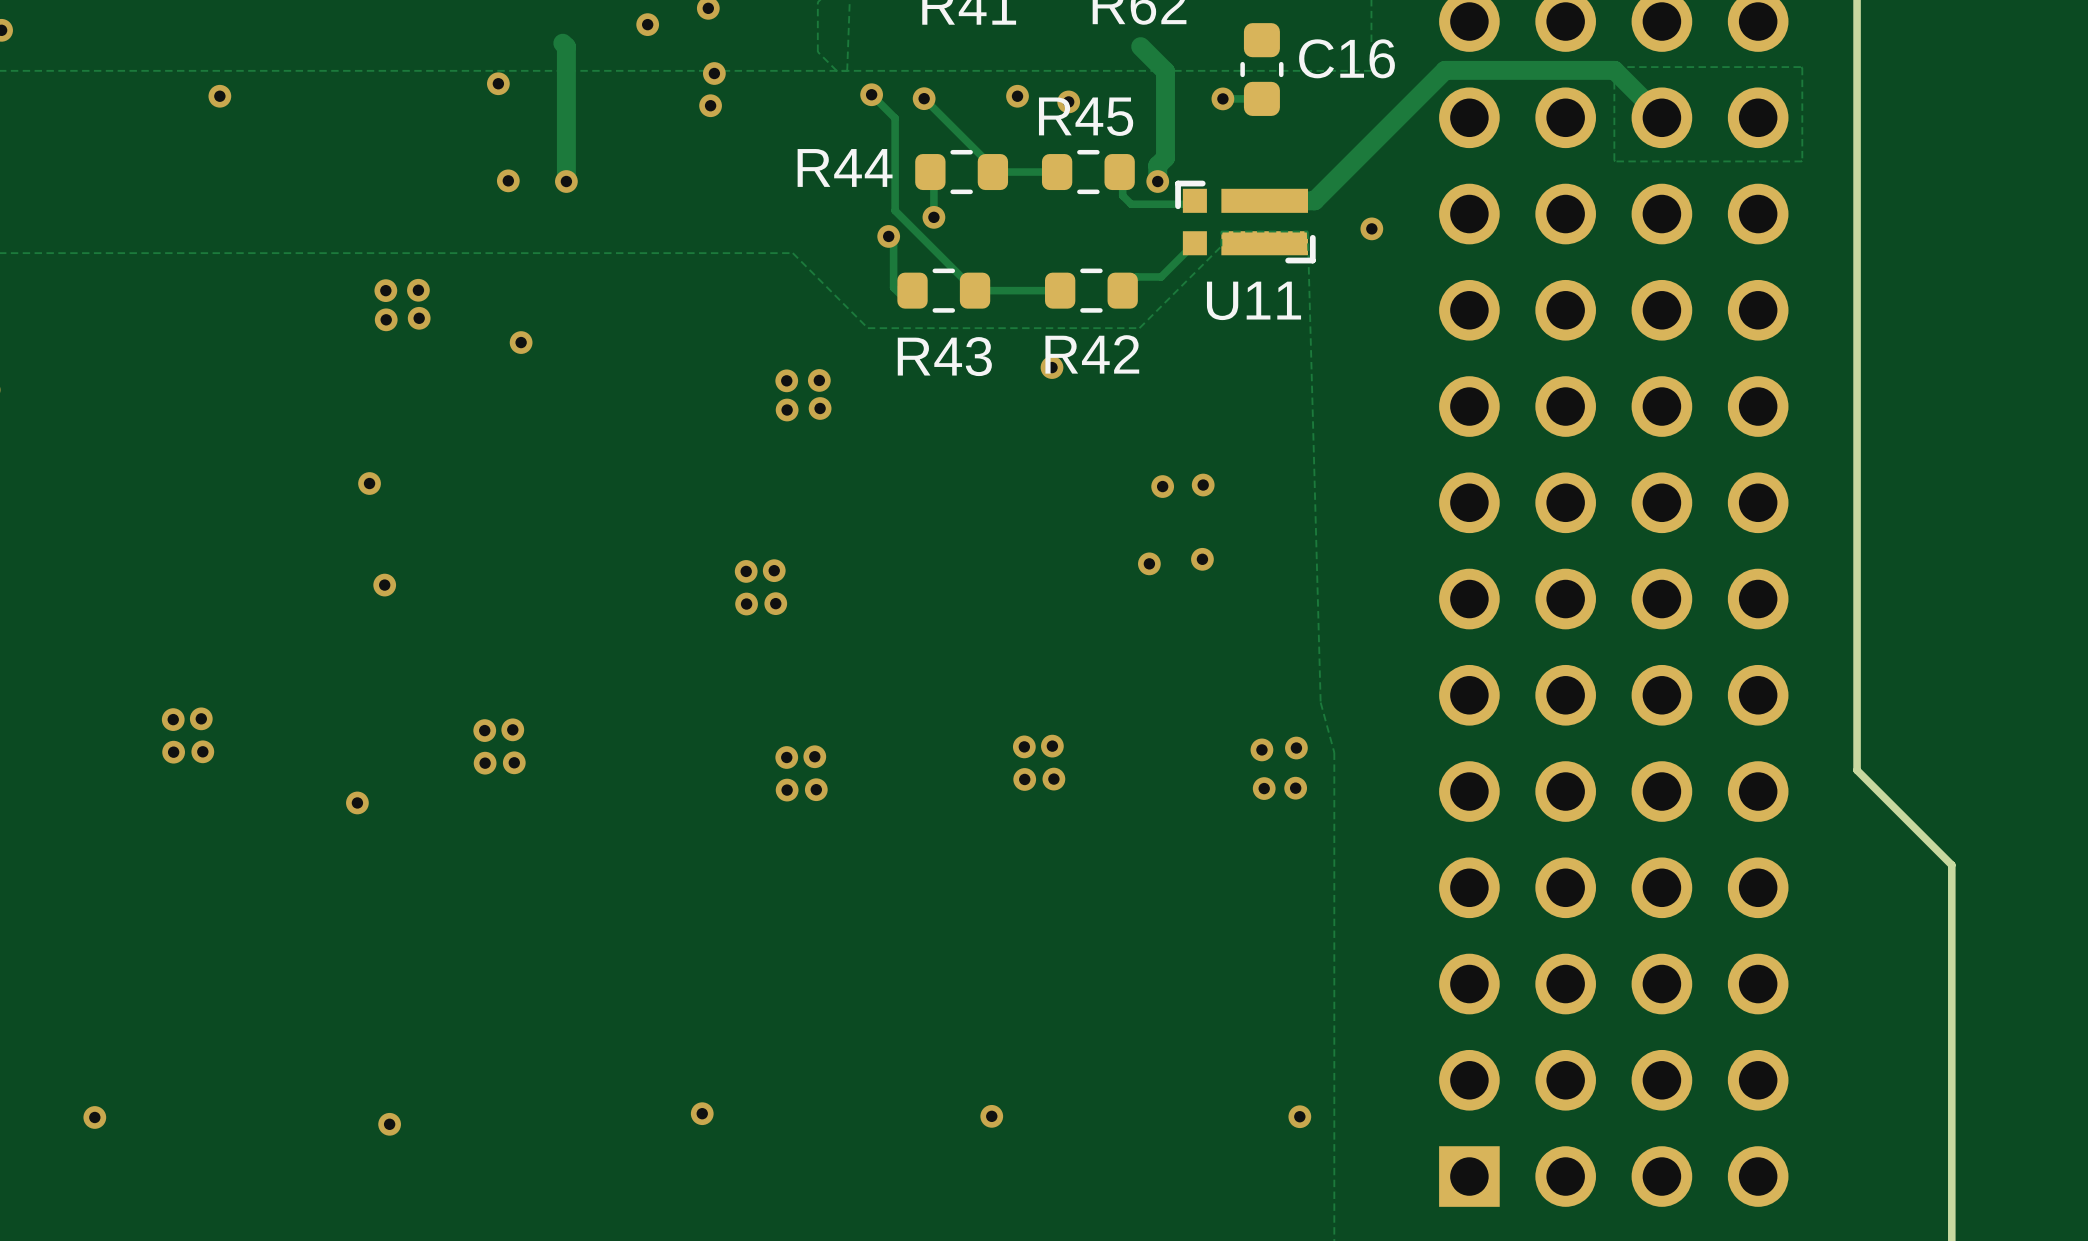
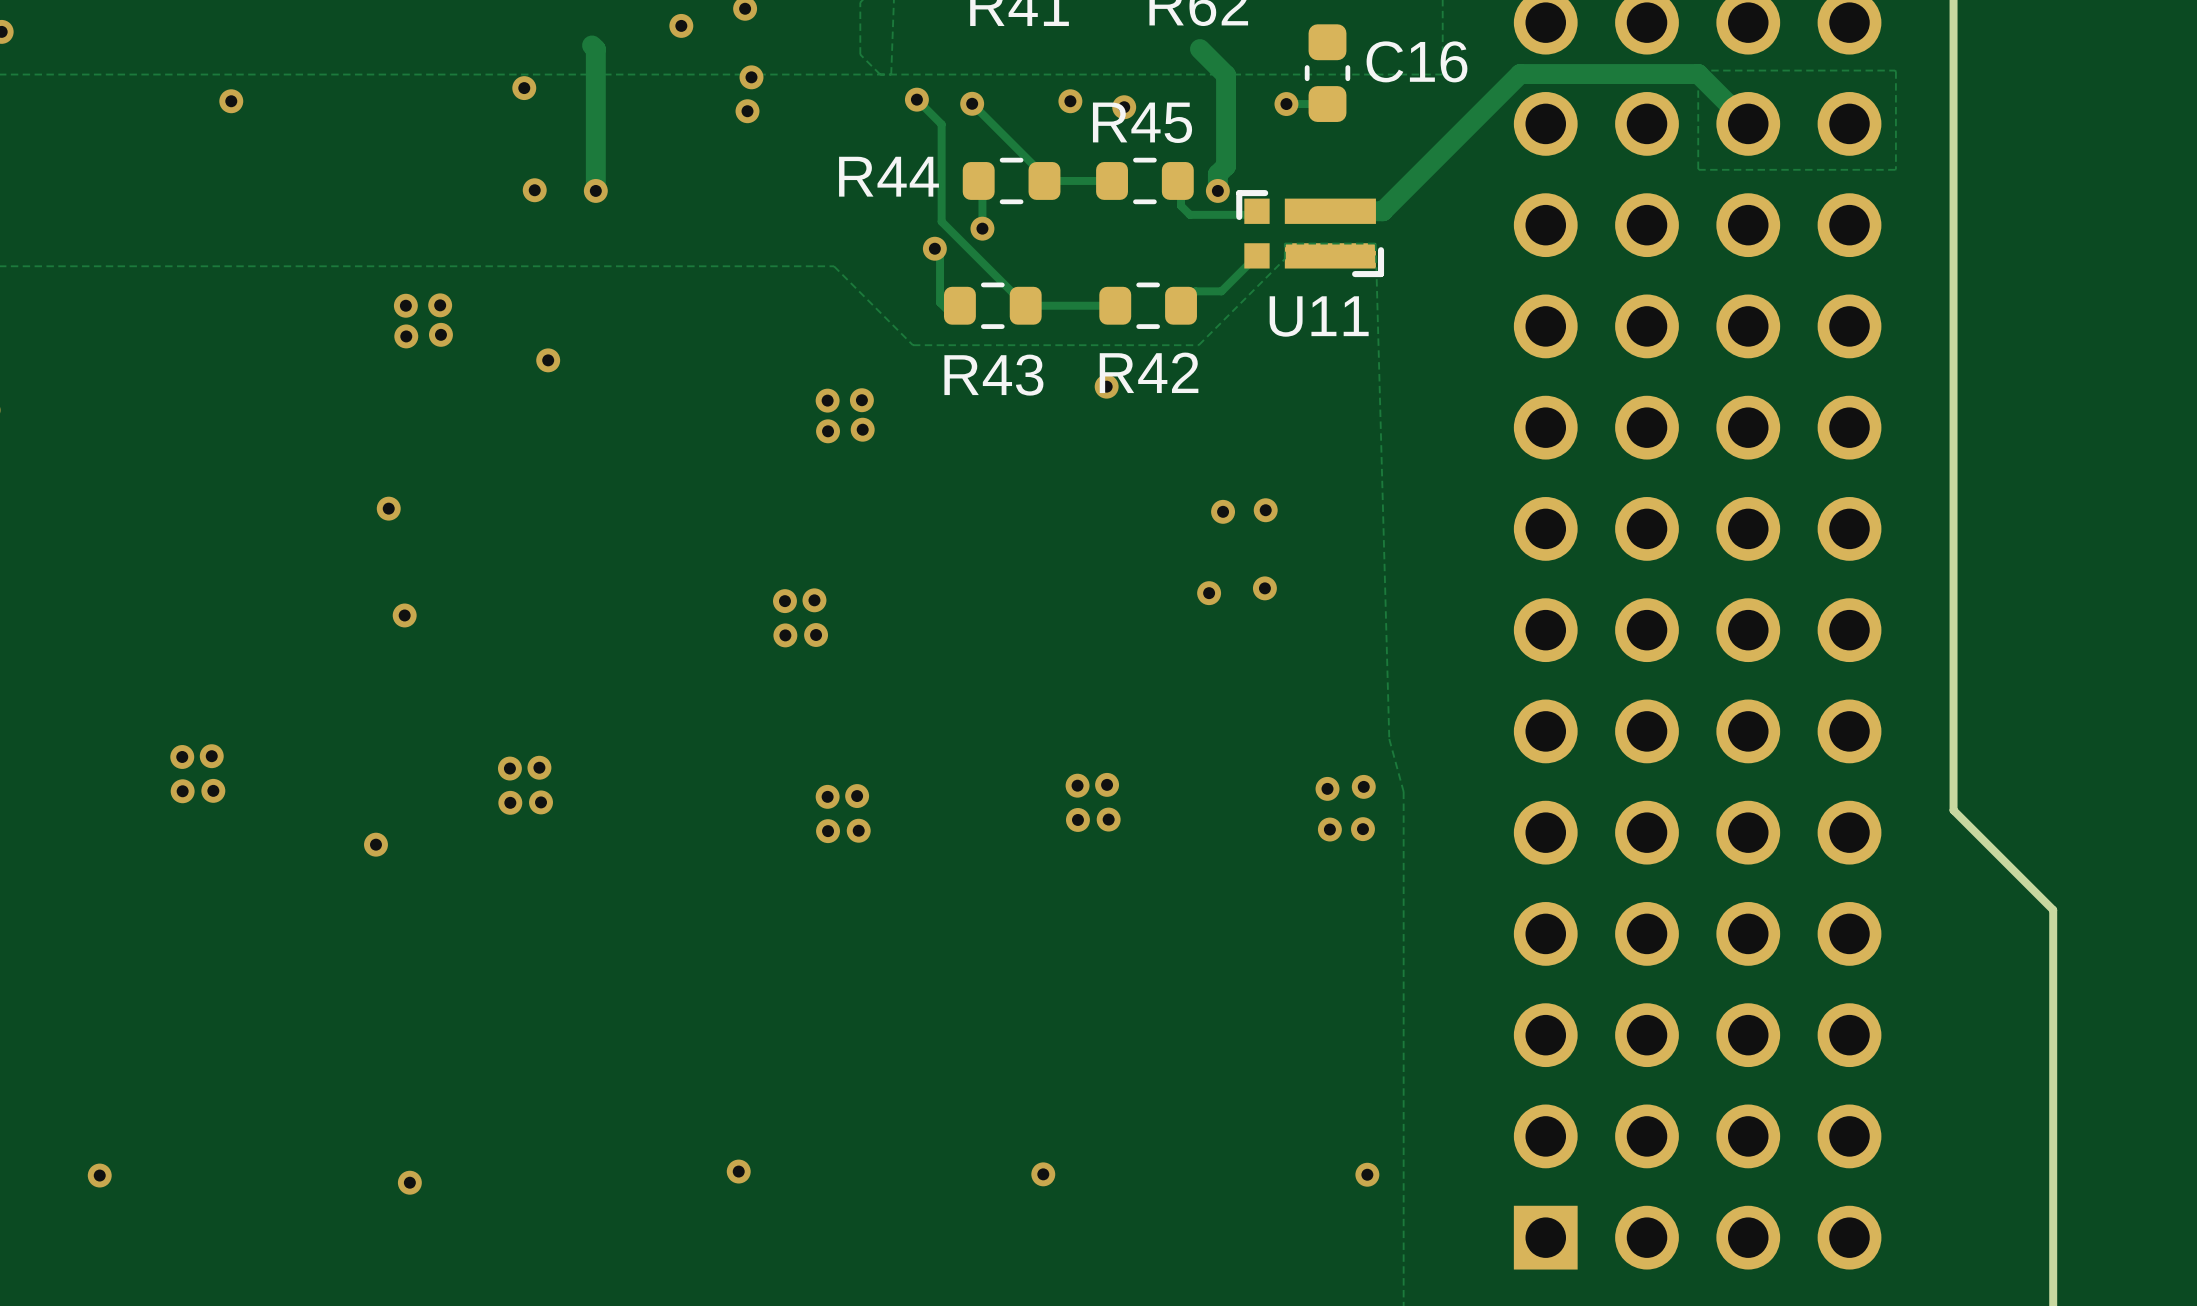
via: (1371, 228) -> none

